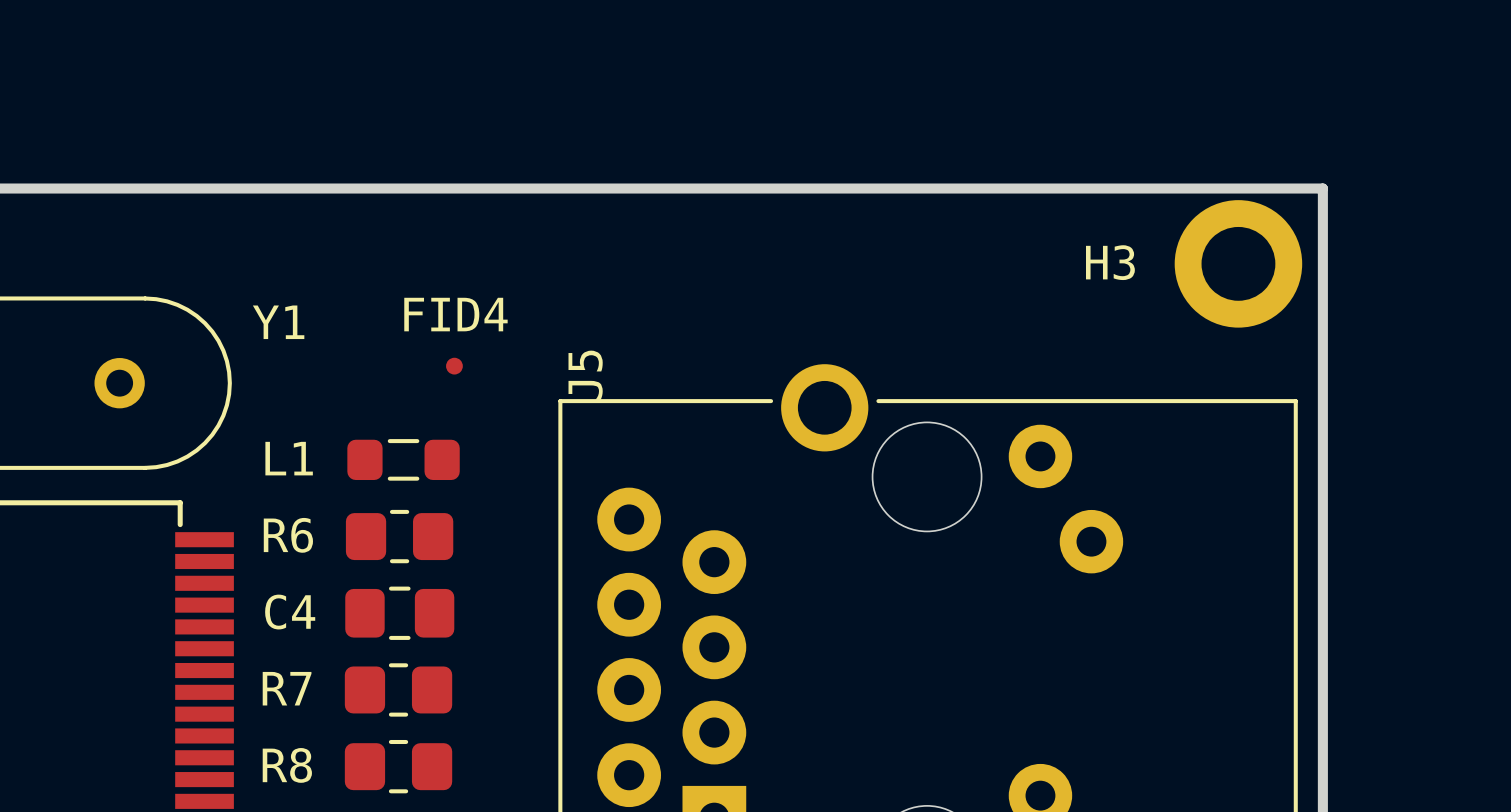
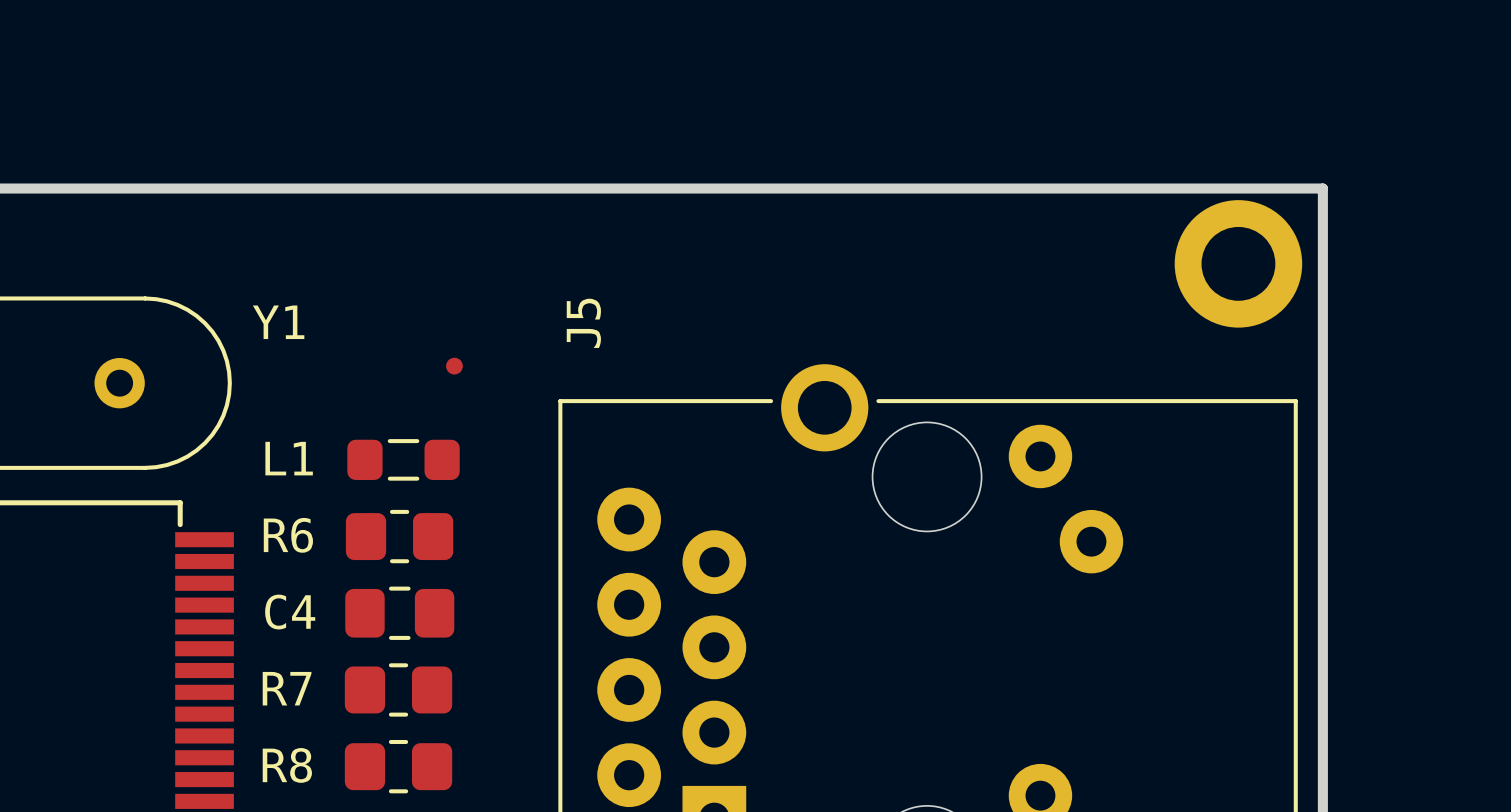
H3 name: H3 (1110, 262) -> none
FID4 name: FID4 (455, 314) -> none
J5 name position: J5 (585, 375) -> J5 (583, 323)

